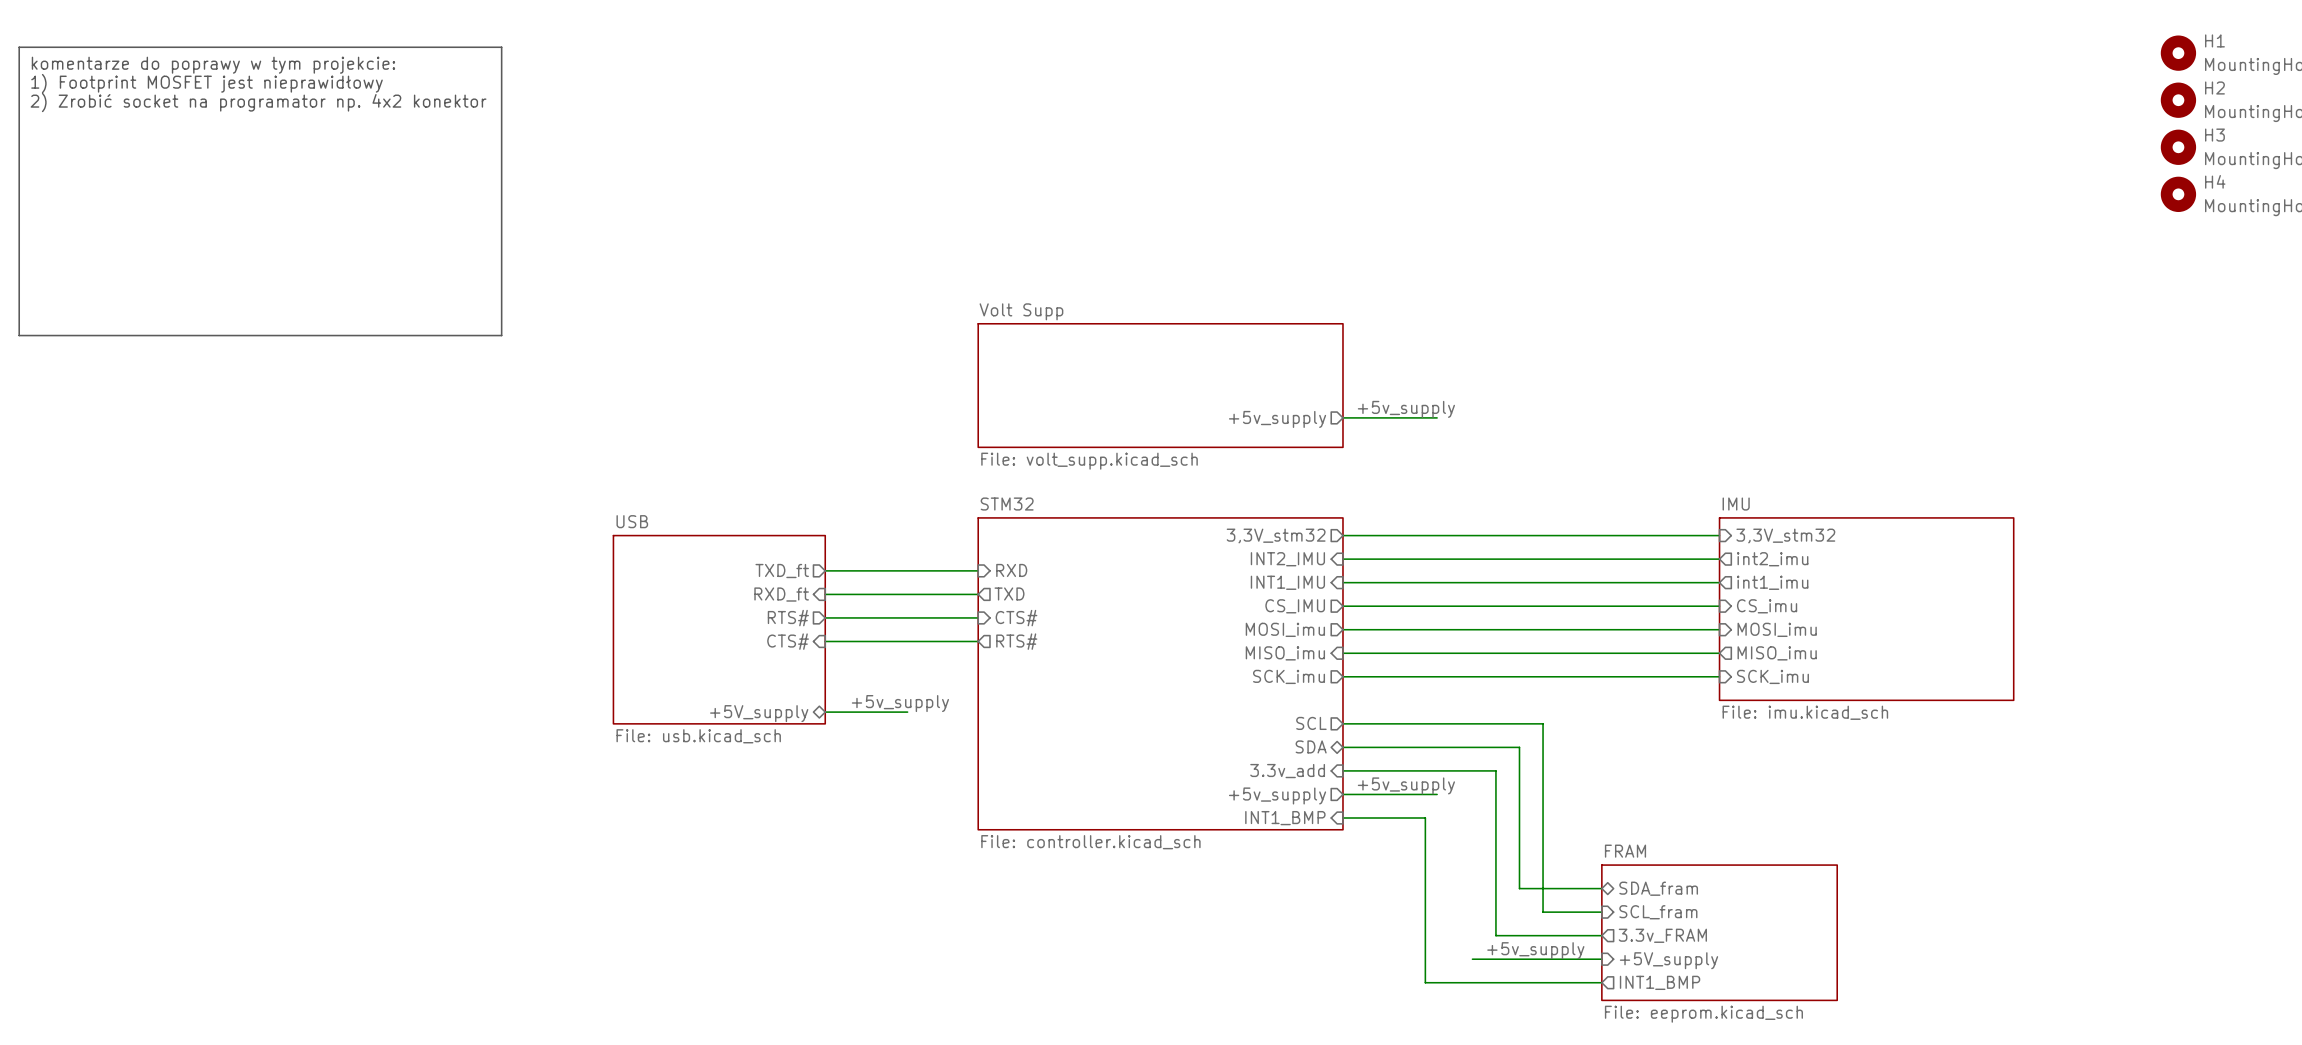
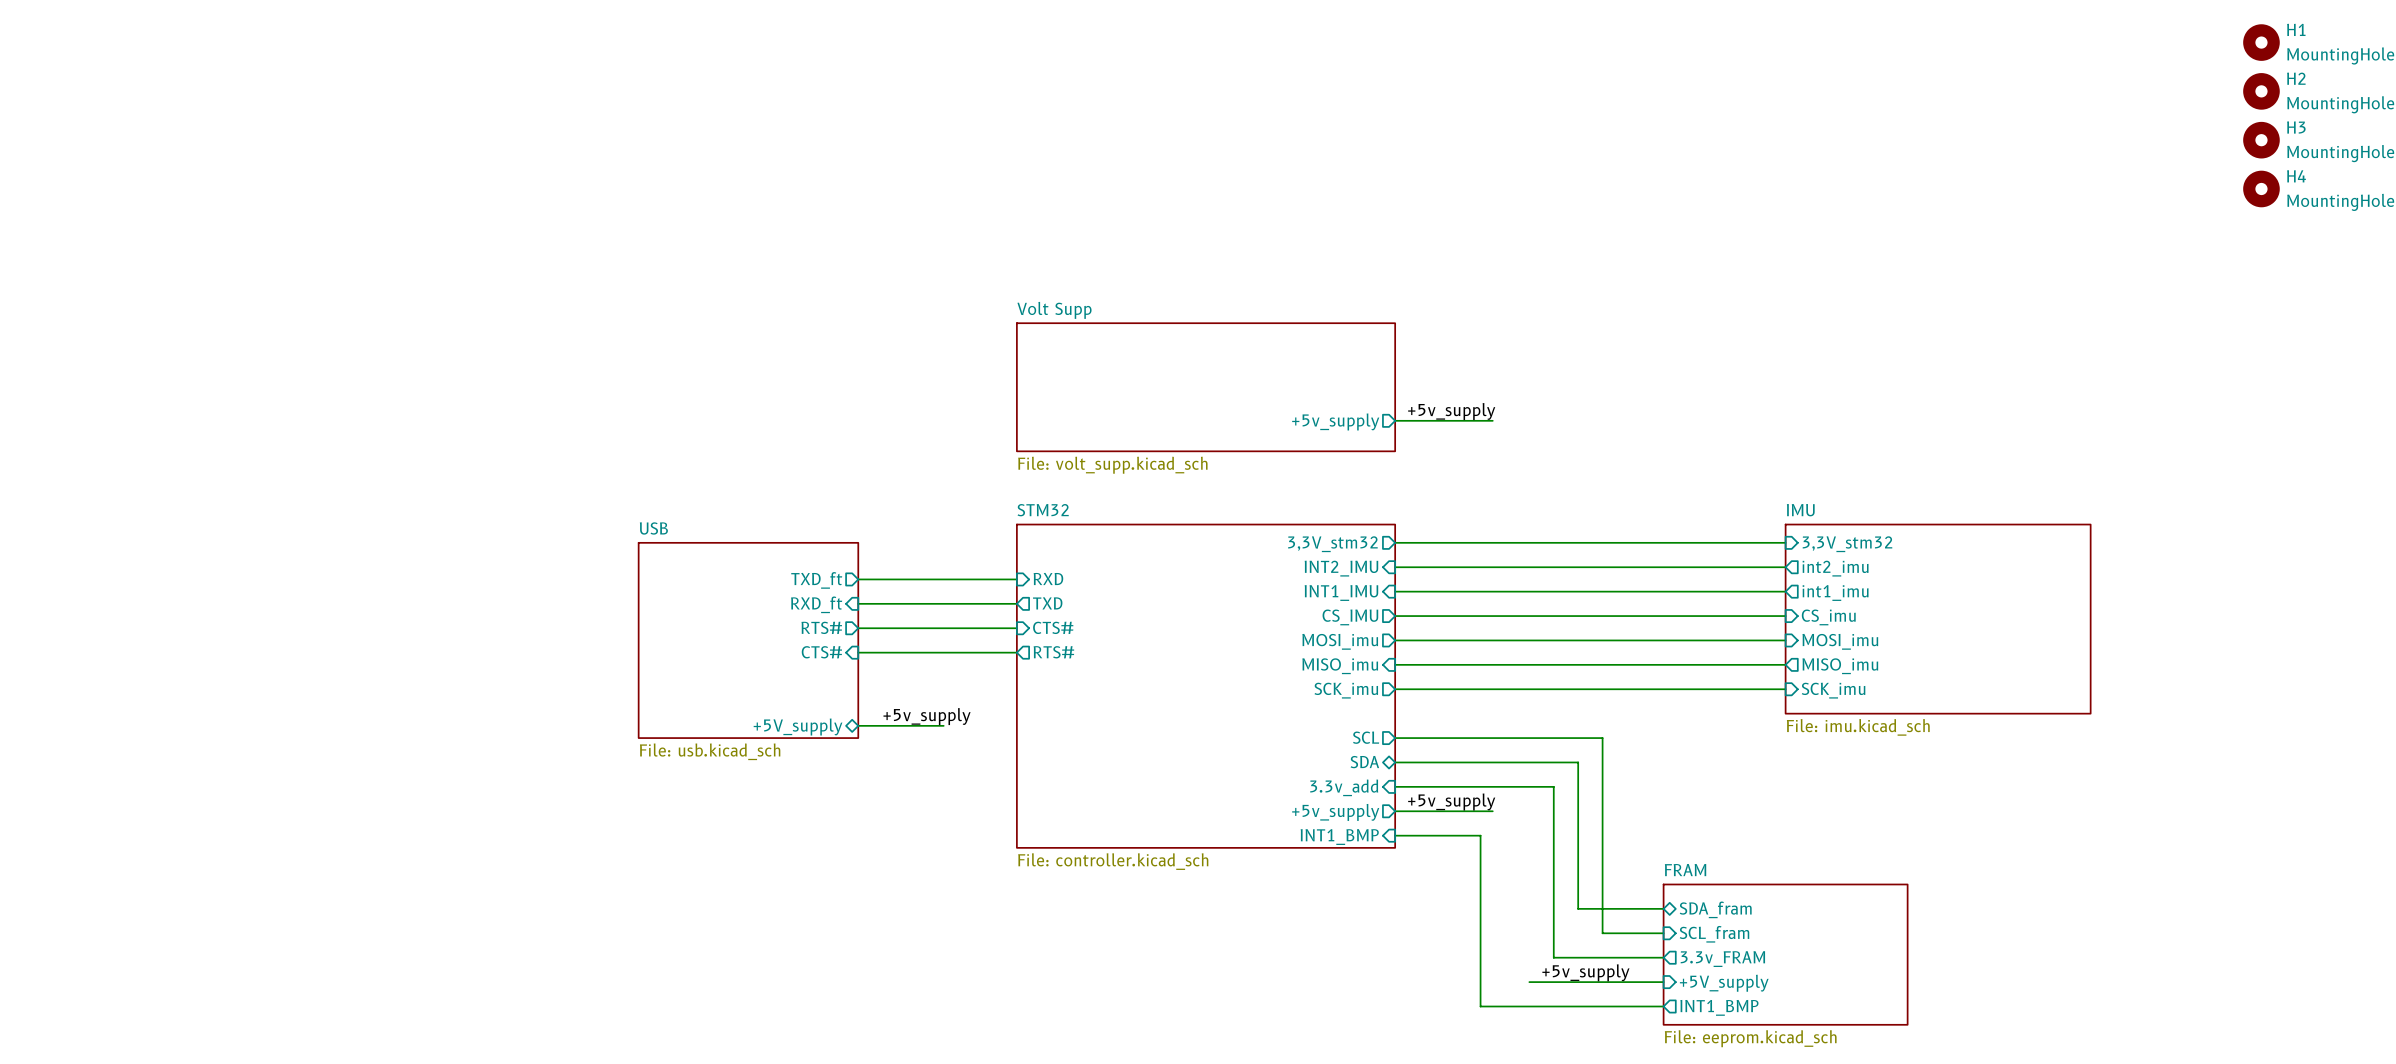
line: (19, 47) (501, 47) (501, 335) (19, 335) (19, 47) -> none
text: komentarze do poprawy w tym projekcie: (213, 65) -> none
text: 1) Footprint MOSFET jest nieprawidłowy (207, 83) -> none
text: 2) Zrobić socket na programator np. 4x2 konektor (258, 102) -> none

